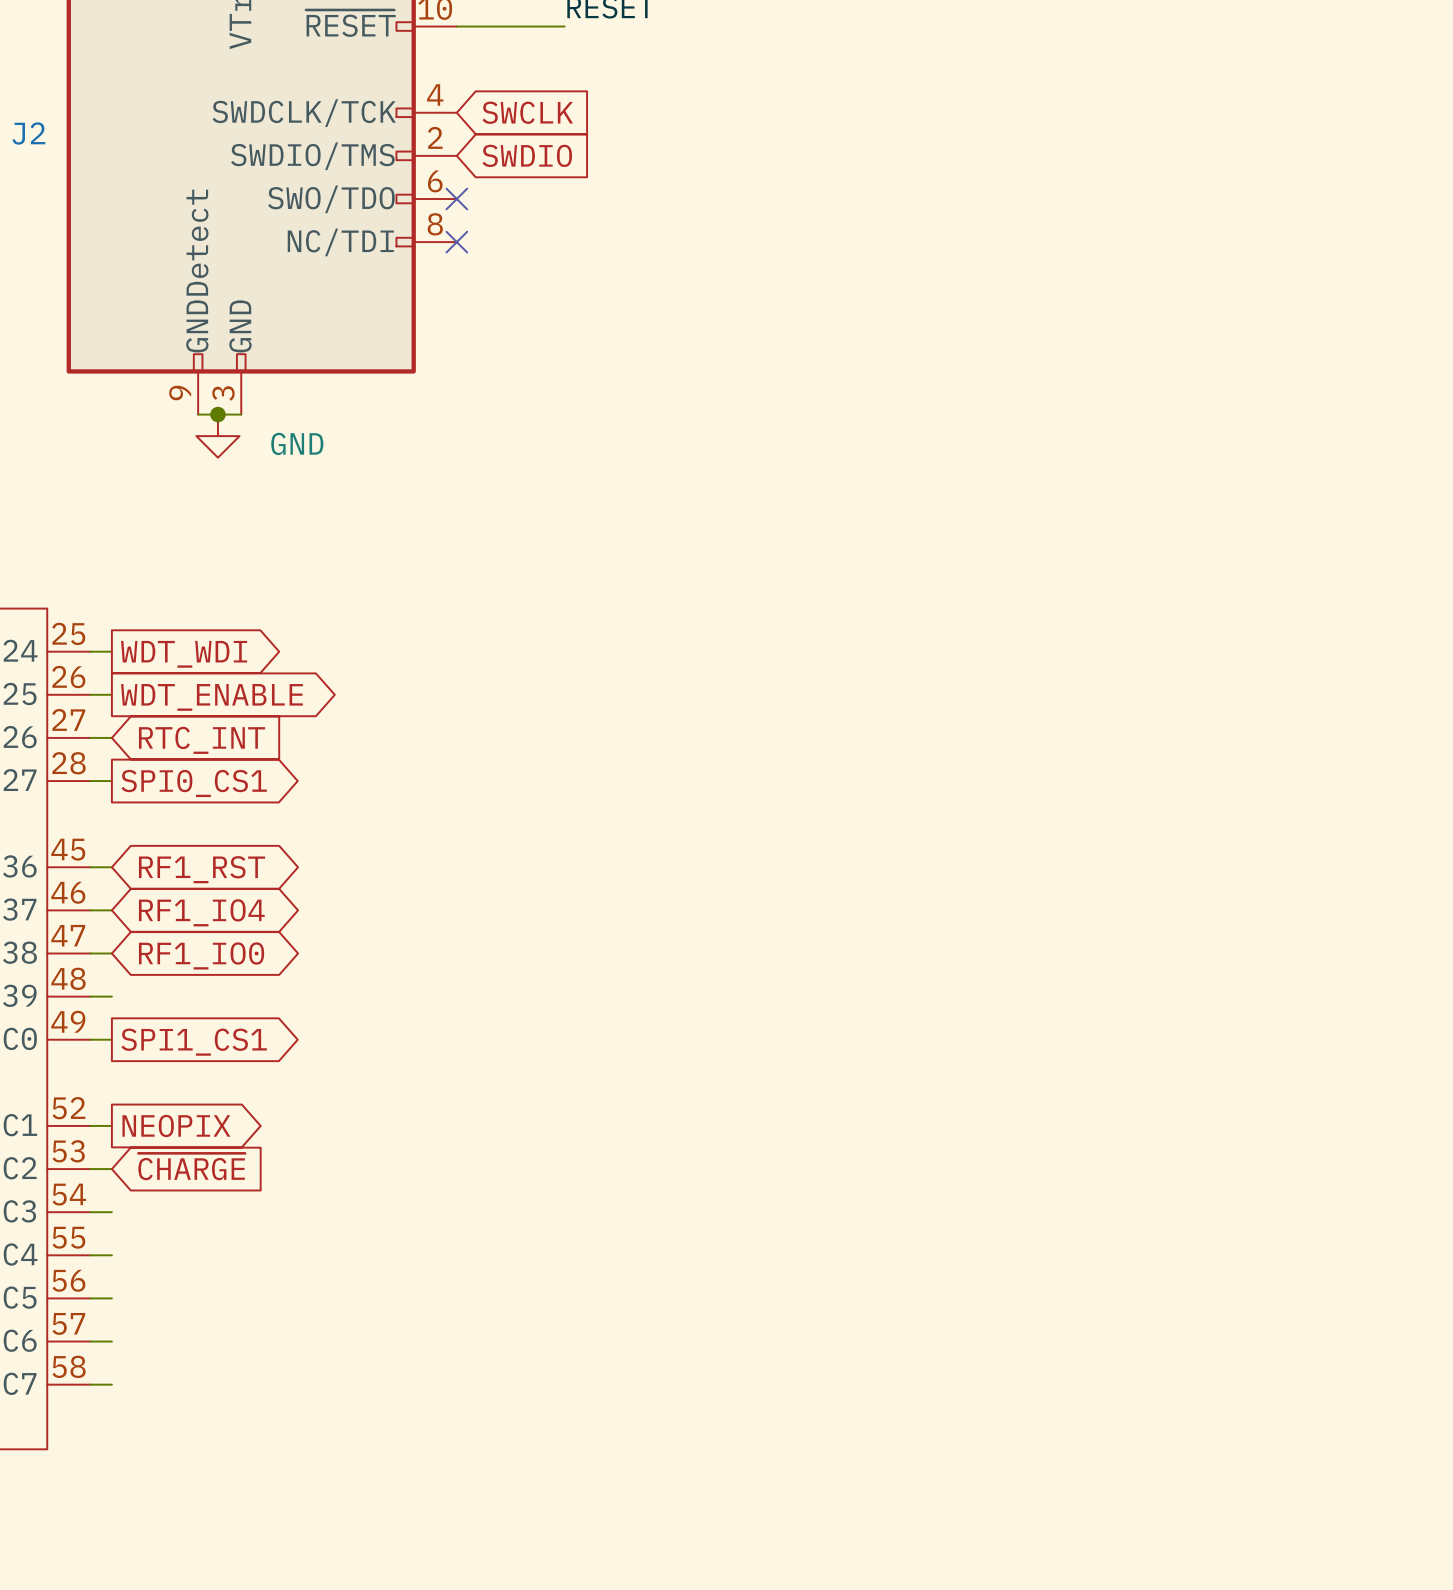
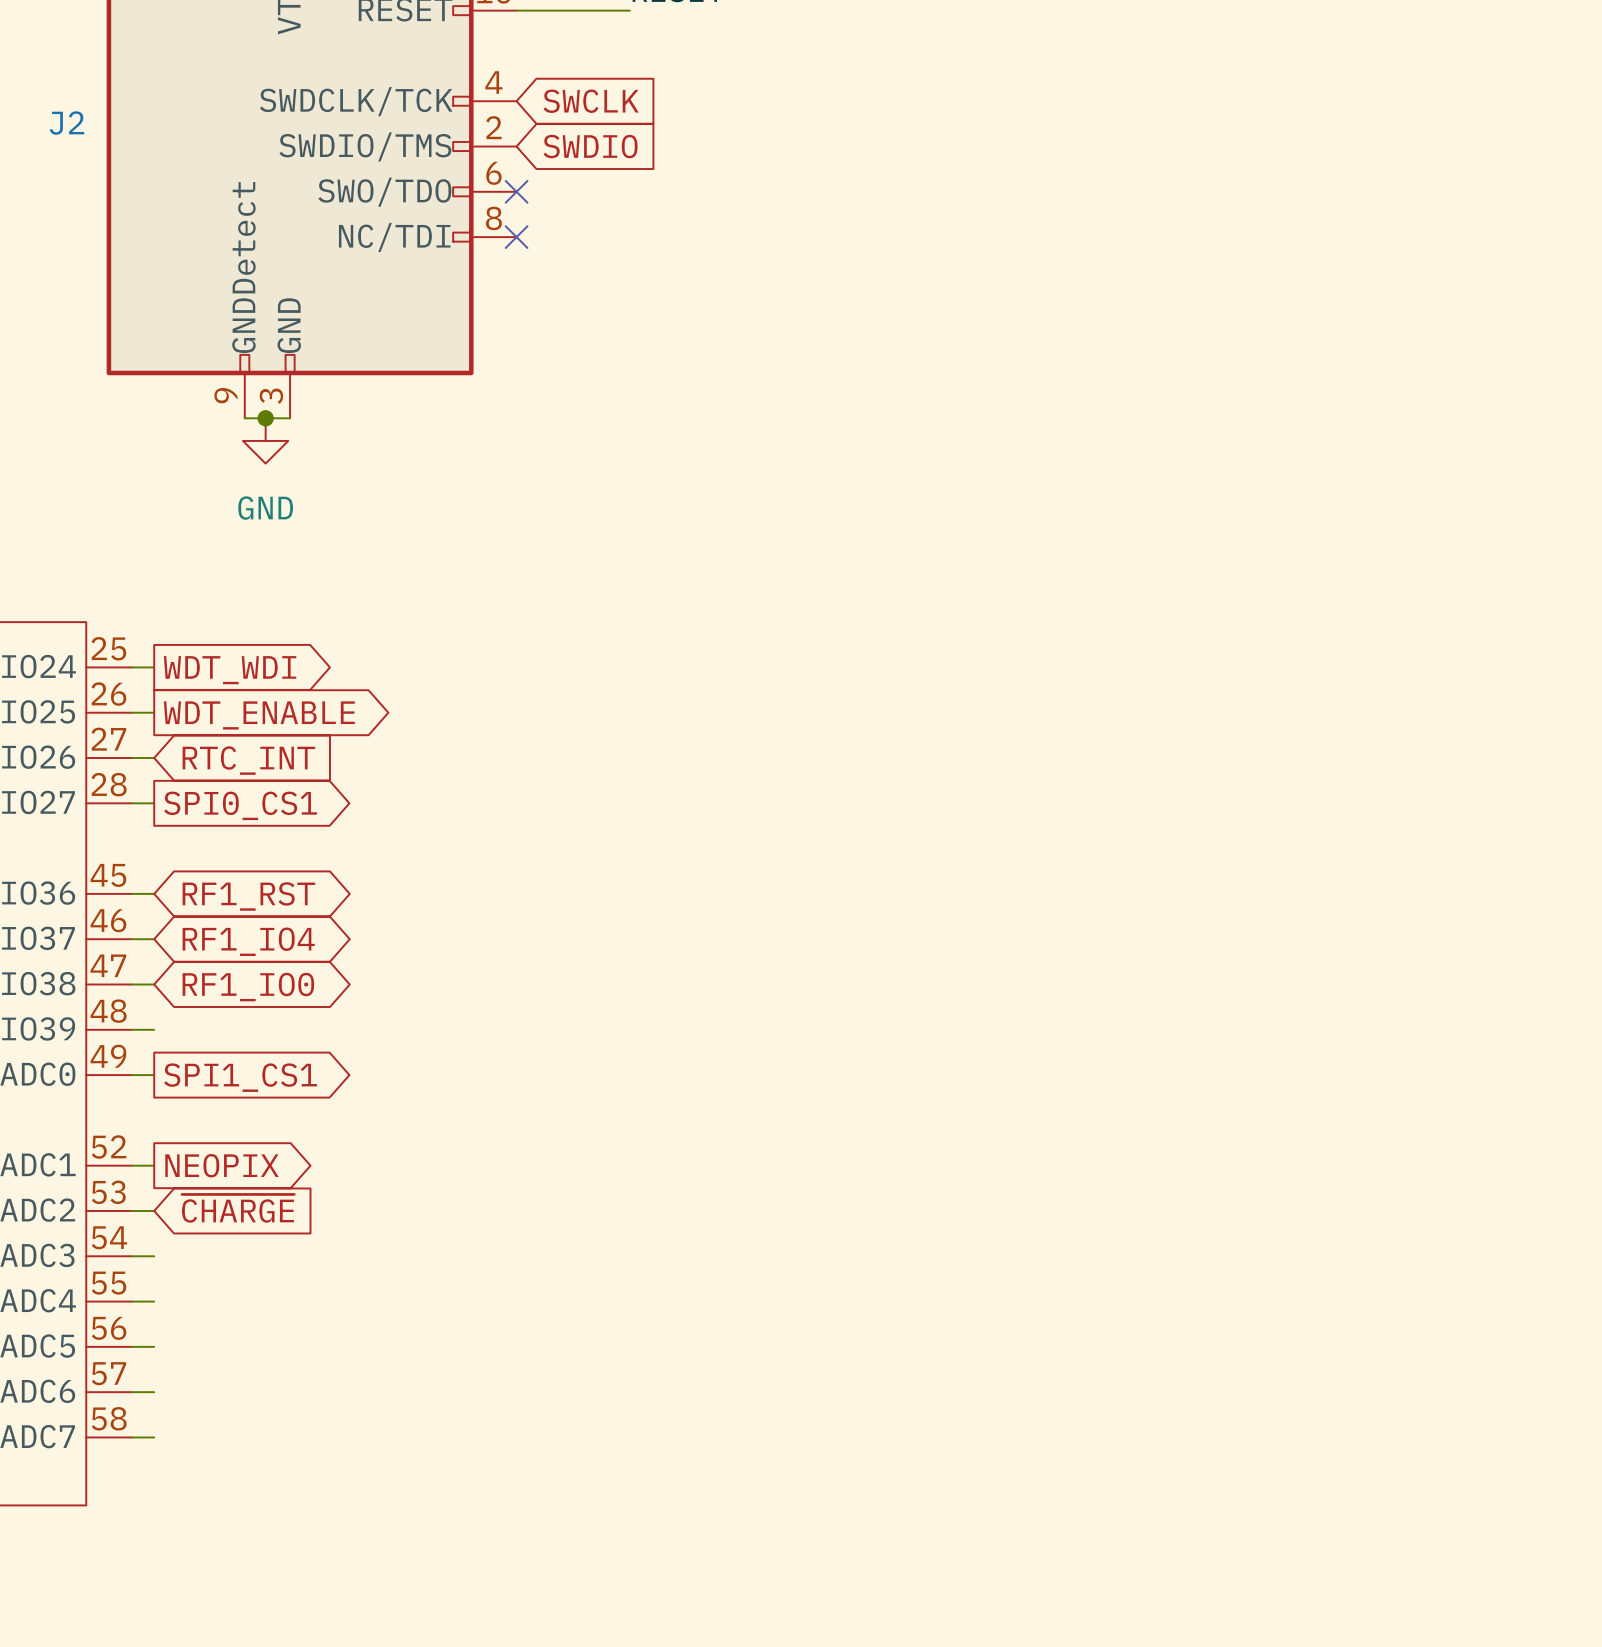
power symbol text position: GND (297, 443) -> GND (265, 508)

